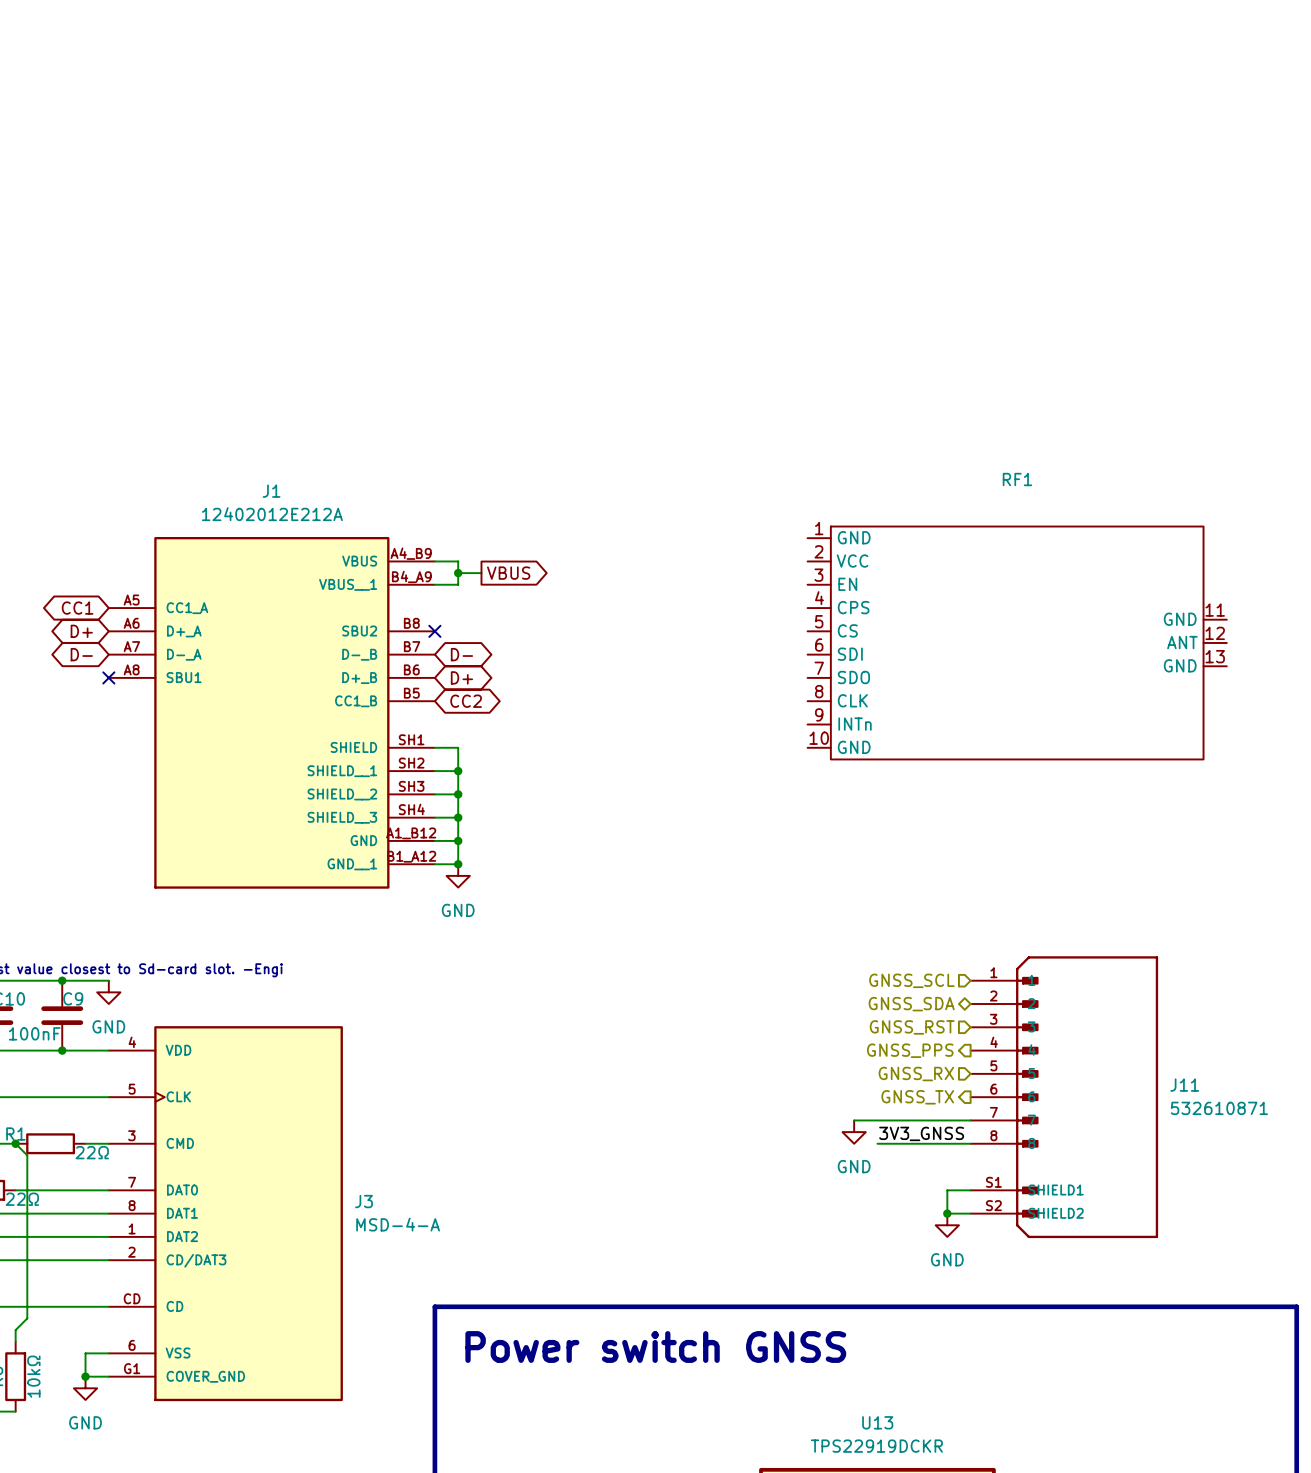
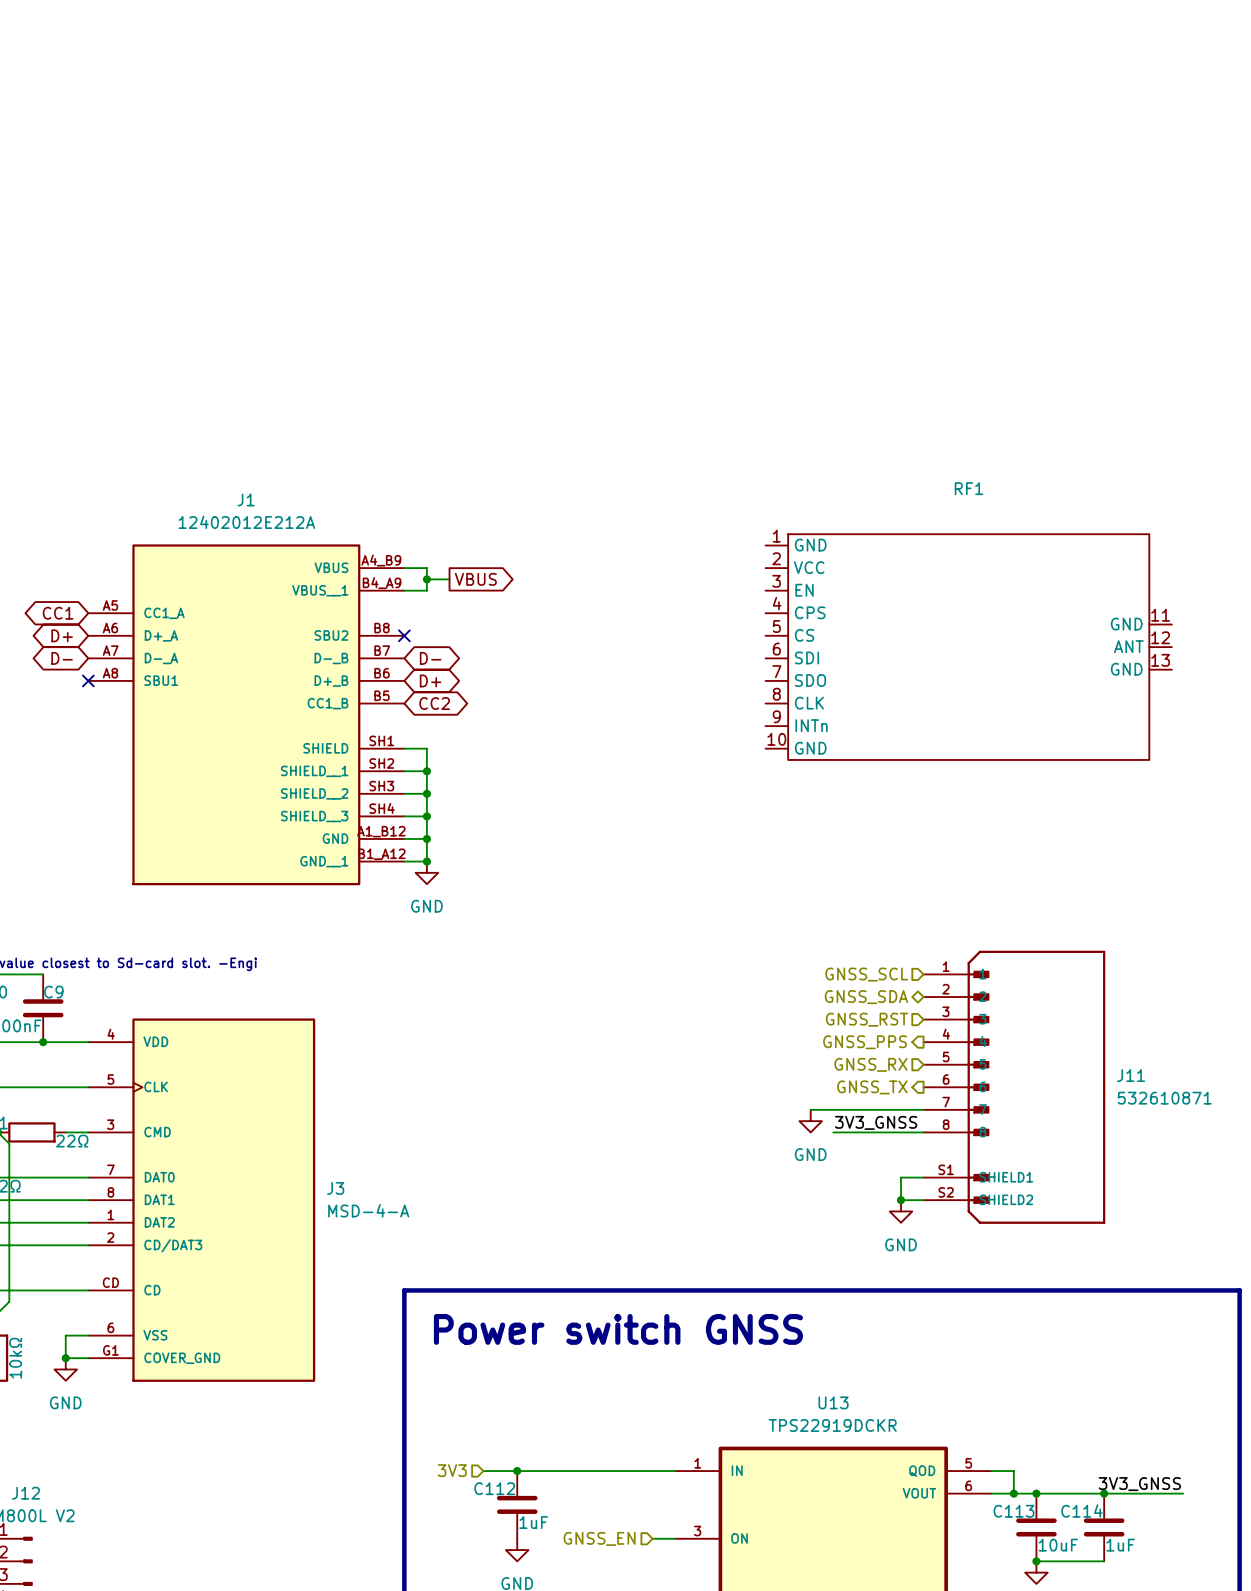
wire: (62, 980) (108, 980) -> none
junction: (62, 980) -> none
power symbol: GND (108, 992) -> none

